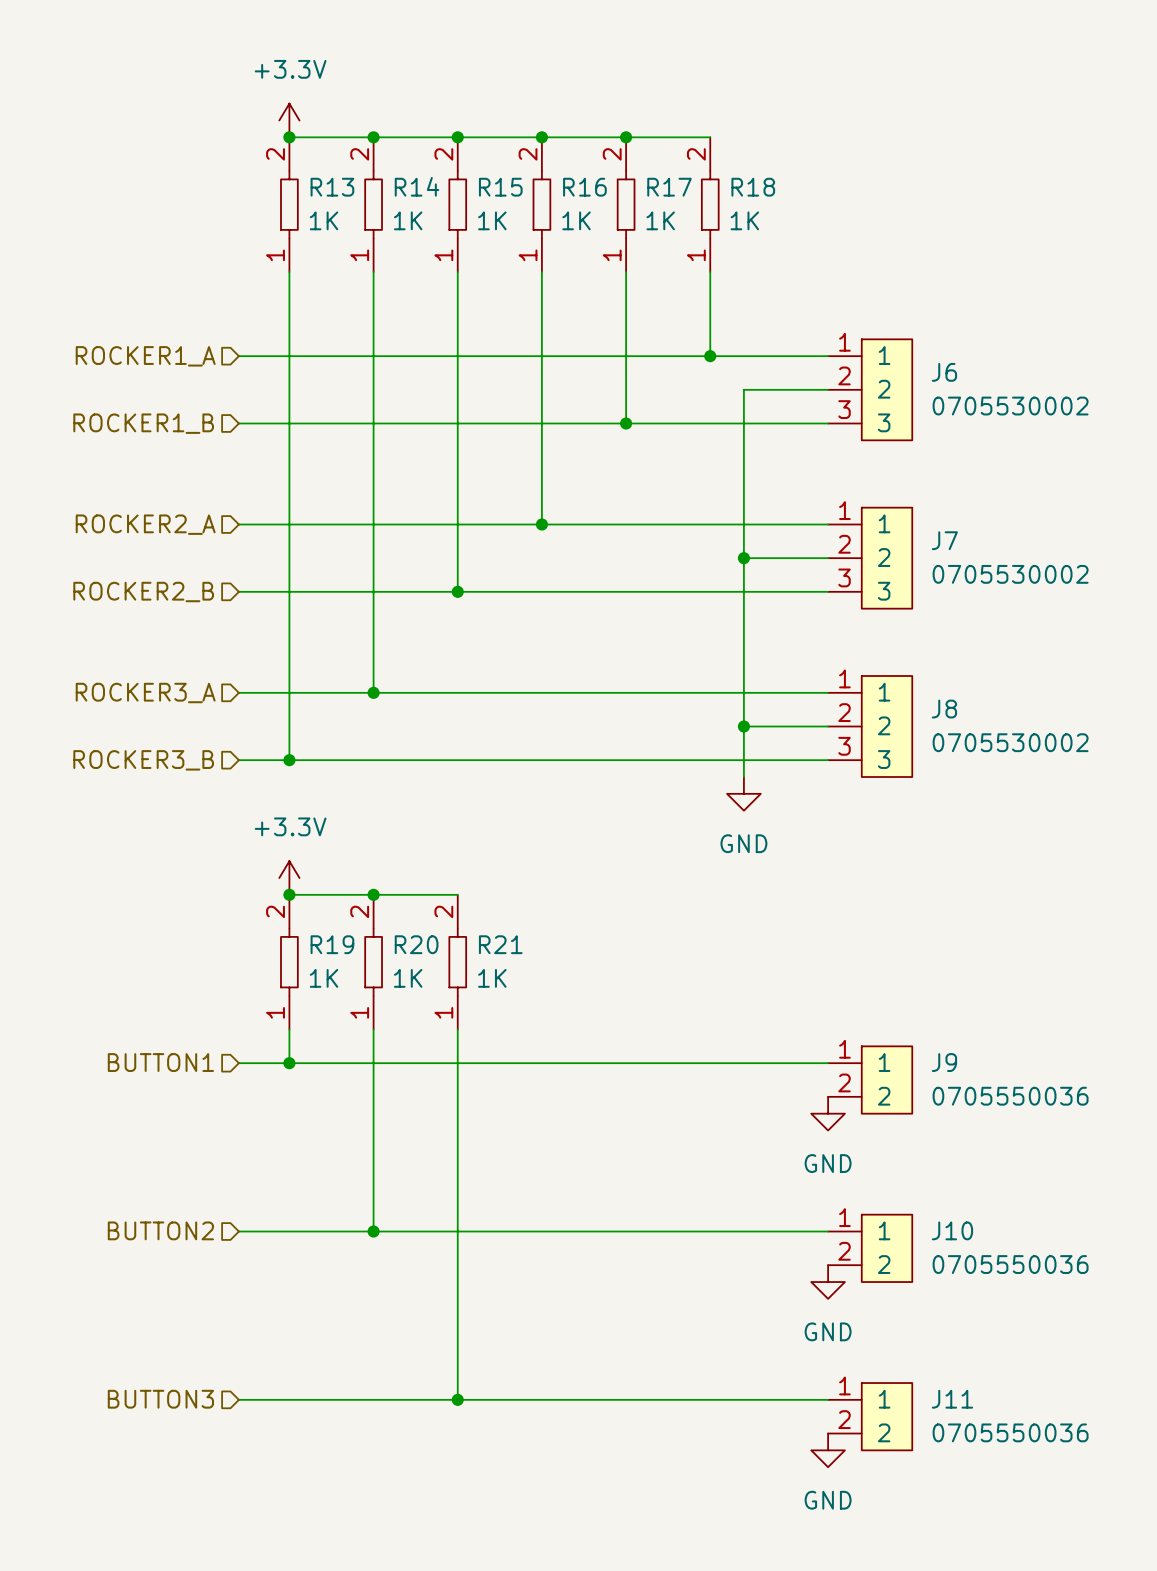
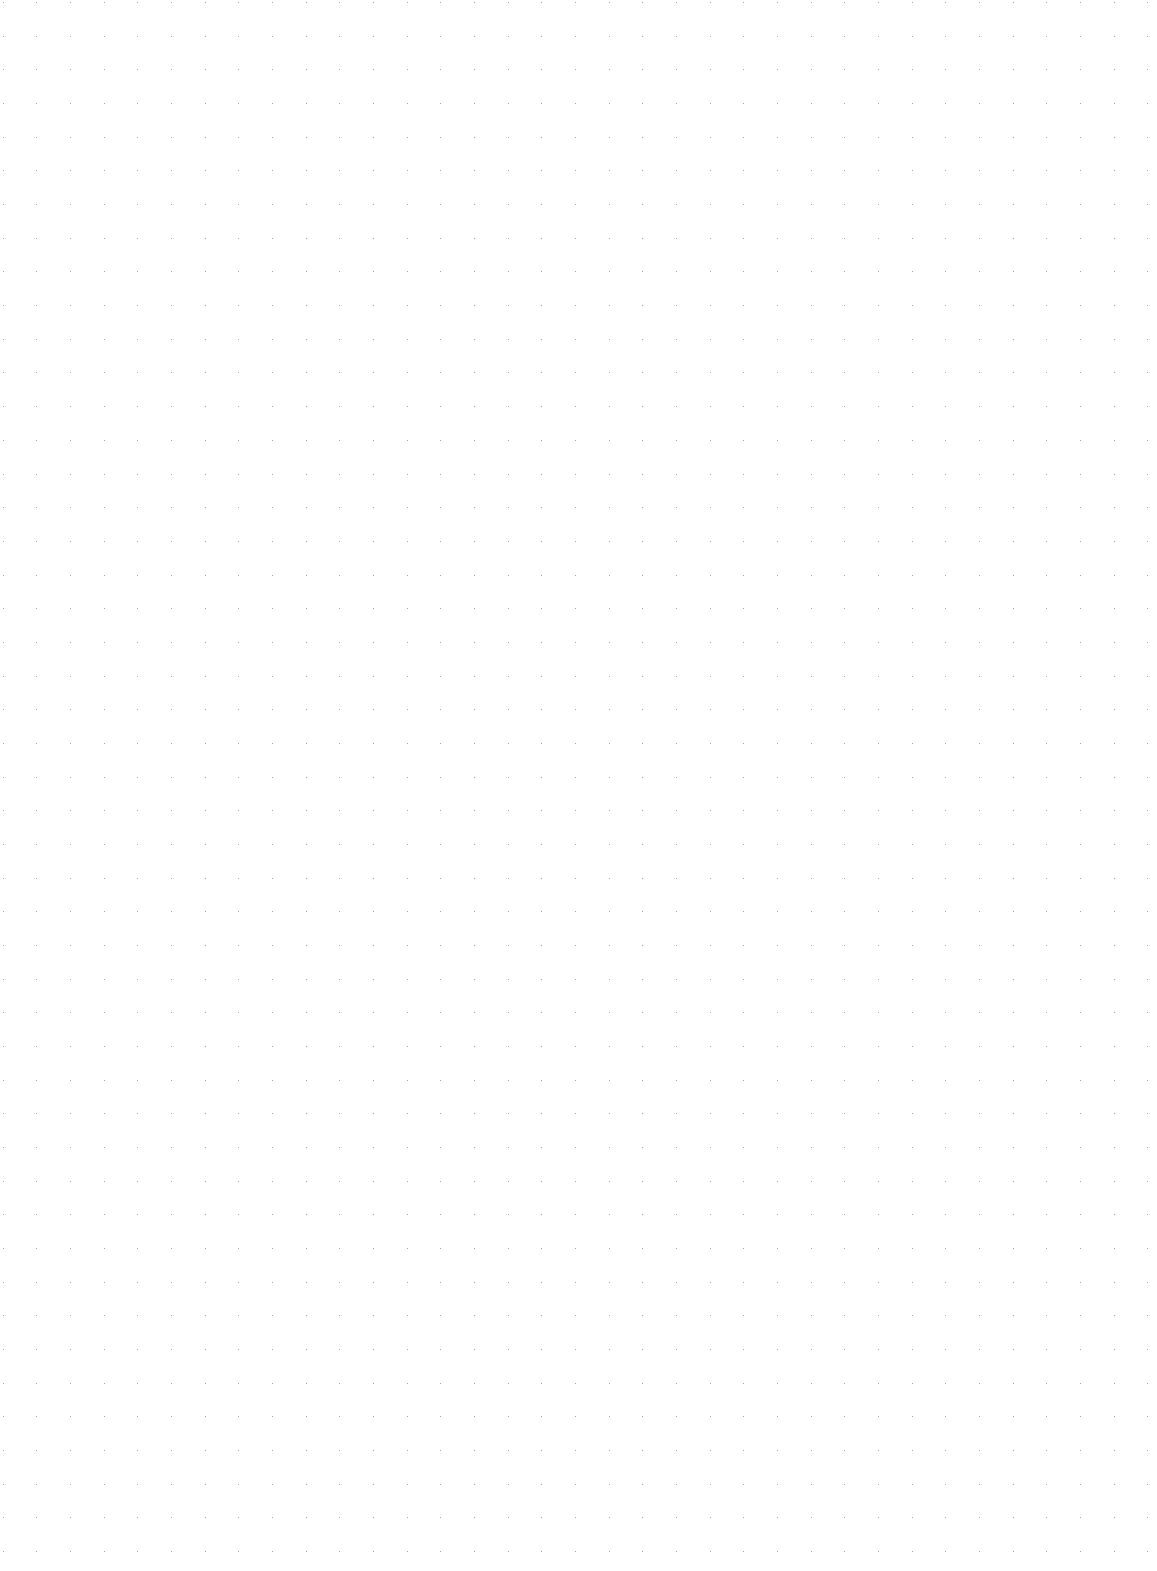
power symbol: +3.3V (289, 120) -> none
wire: (289, 137) (710, 137) -> none
junction: (289, 137) -> none
junction: (373, 137) -> none
junction: (457, 137) -> none
junction: (541, 137) -> none
junction: (626, 137) -> none
R13: (289, 204) -> none
R14: (373, 204) -> none
R15: (457, 204) -> none
R16: (541, 204) -> none
R17: (626, 204) -> none
R18: (710, 204) -> none
wire: (289, 271) (289, 760) -> none
wire: (373, 271) (373, 692) -> none
wire: (457, 271) (457, 591) -> none
wire: (541, 271) (541, 524) -> none
wire: (626, 271) (626, 423) -> none
wire: (710, 271) (710, 356) -> none
hierarchical label: ROCKER1_A (145, 356) -> none
wire: (238, 356) (828, 356) -> none
junction: (710, 356) -> none
wire: (828, 389) (743, 389) (743, 777) -> none
J6: 0705530002 (870, 389) -> none
hierarchical label: ROCKER1_B (143, 423) -> none
wire: (238, 423) (828, 423) -> none
junction: (626, 423) -> none
hierarchical label: ROCKER2_A (145, 524) -> none
wire: (238, 524) (828, 524) -> none
junction: (541, 524) -> none
wire: (743, 558) (828, 558) -> none
junction: (743, 558) -> none
J7: 0705530002 (870, 558) -> none
wire: (238, 591) (828, 591) -> none
junction: (457, 591) -> none
hierarchical label: ROCKER2_B (143, 592) -> none
wire: (238, 692) (828, 692) -> none
junction: (373, 692) -> none
hierarchical label: ROCKER3_A (145, 693) -> none
wire: (743, 726) (828, 726) -> none
junction: (743, 726) -> none
J8: 0705530002 (870, 726) -> none
hierarchical label: ROCKER3_B (143, 760) -> none
wire: (238, 760) (828, 760) -> none
junction: (289, 760) -> none
power symbol: GND (743, 793) -> none
power symbol: +3.3V (289, 878) -> none
wire: (289, 894) (457, 894) -> none
junction: (289, 894) -> none
junction: (373, 894) -> none
R19: (289, 962) -> none
R20: (373, 962) -> none
R21: (457, 962) -> none
wire: (289, 1029) (289, 1063) -> none
wire: (373, 1029) (373, 1231) -> none
wire: (457, 1029) (457, 1399) -> none
hierarchical label: BUTTON1 (160, 1062) -> none
wire: (238, 1063) (828, 1063) -> none
junction: (289, 1063) -> none
J9: 0705550036 (870, 1080) -> none
power symbol: GND (828, 1113) -> none
hierarchical label: BUTTON2 (160, 1230) -> none
wire: (238, 1231) (828, 1231) -> none
junction: (373, 1231) -> none
J10: 0705550036 (870, 1248) -> none
power symbol: GND (828, 1282) -> none
hierarchical label: BUTTON3 (160, 1399) -> none
wire: (238, 1399) (828, 1399) -> none
junction: (457, 1399) -> none
J11: 0705550036 (870, 1416) -> none
power symbol: GND (828, 1450) -> none

